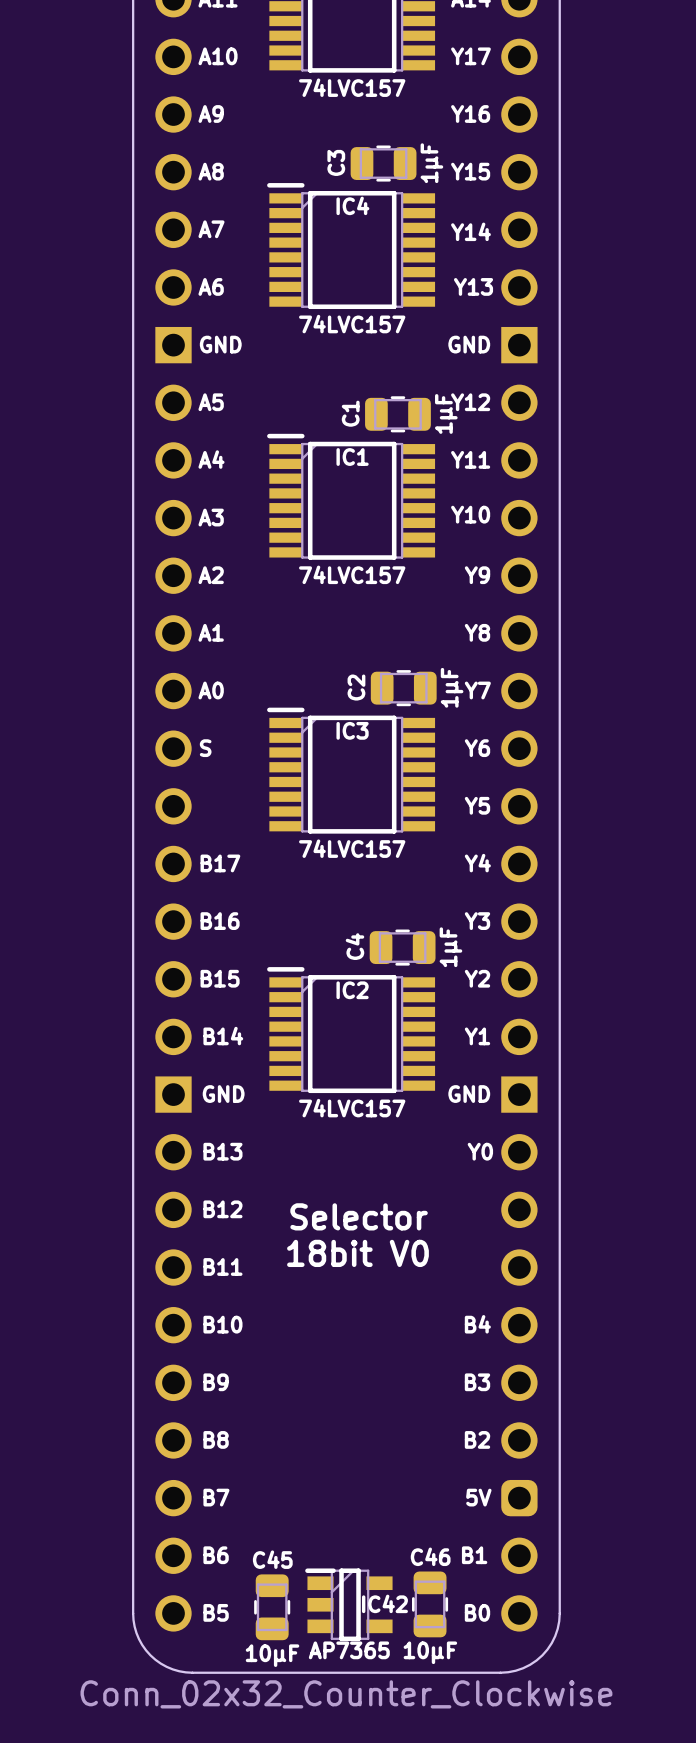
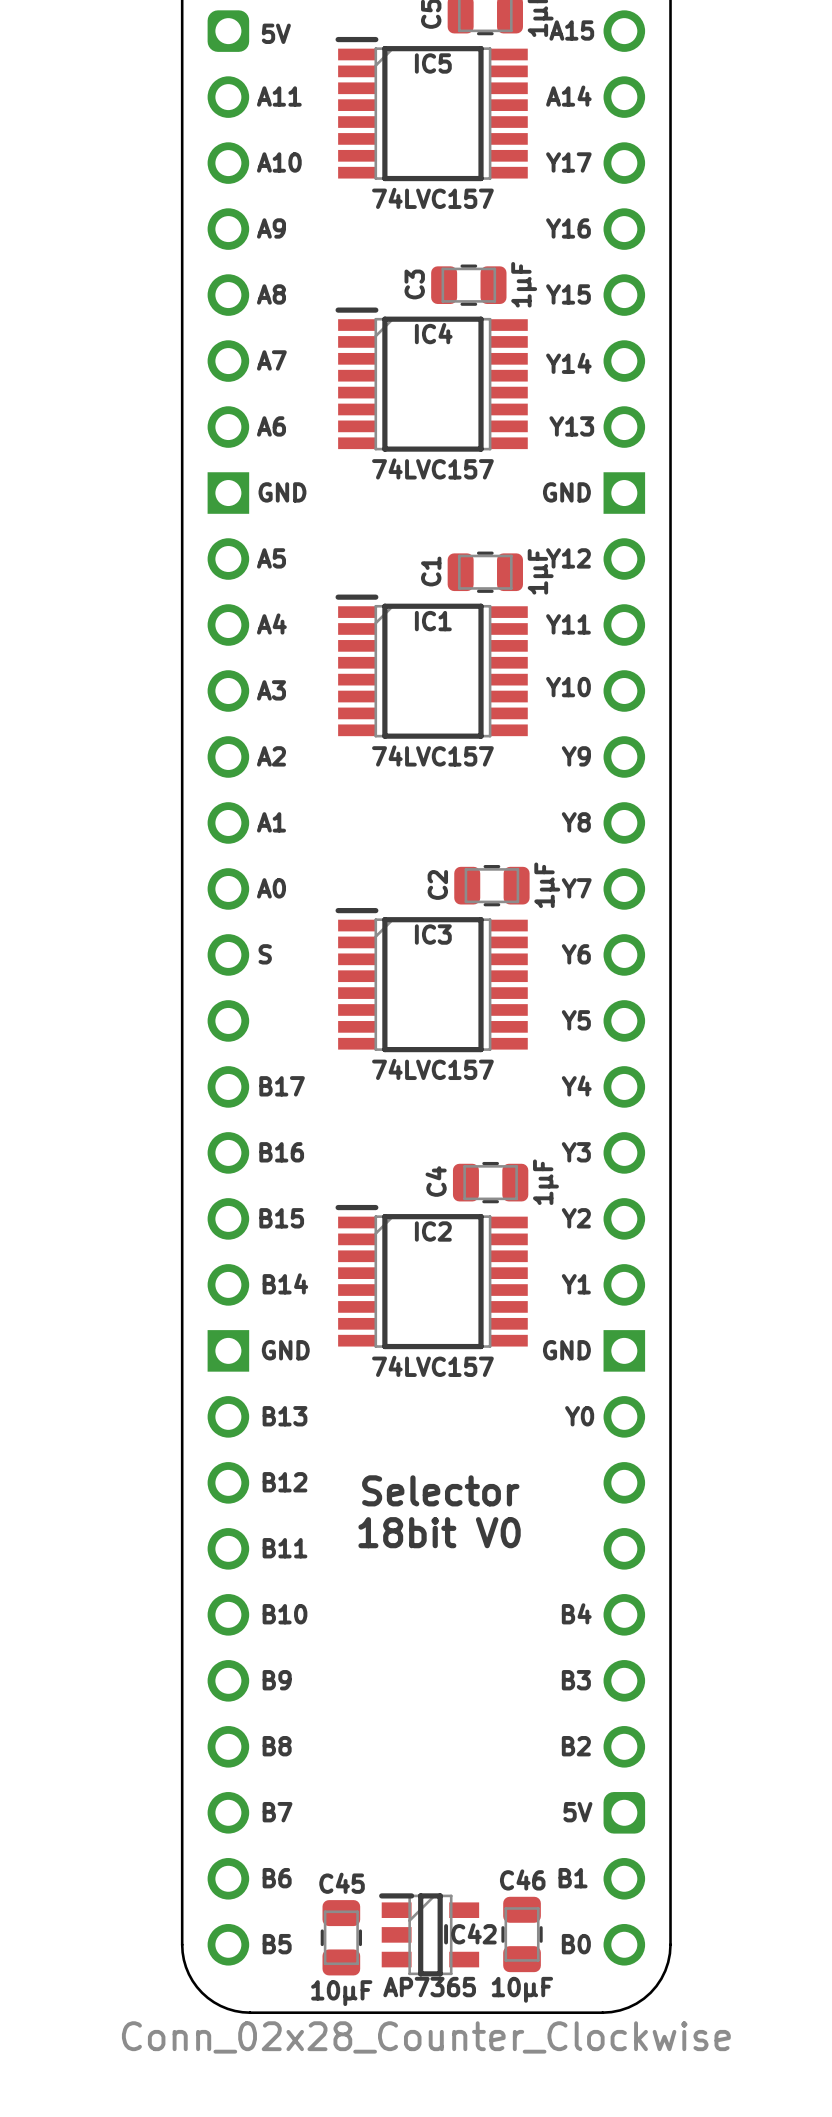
part value: Conn_02x32_Counter_Clockwise (346, 1694) -> Conn_02x28_Counter_Clockwise (426, 2037)

